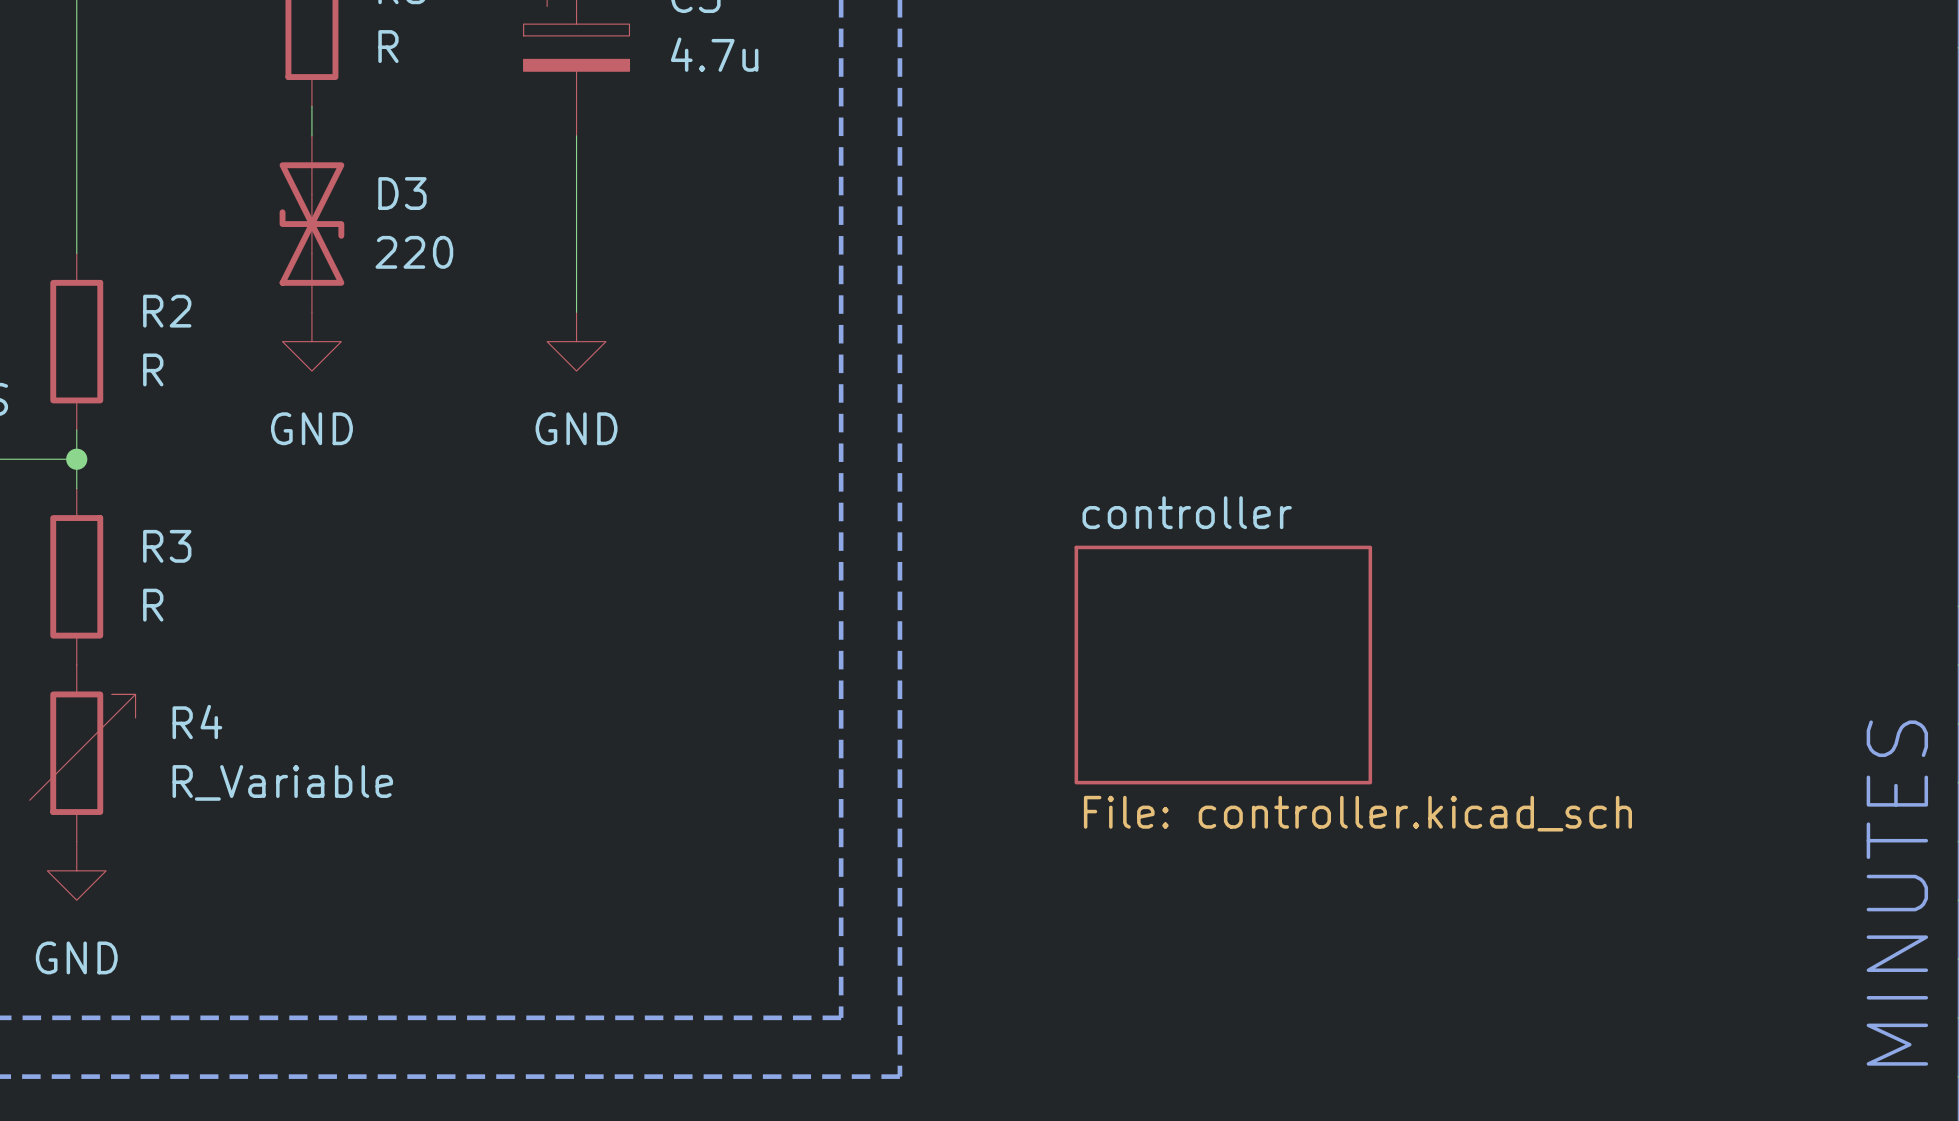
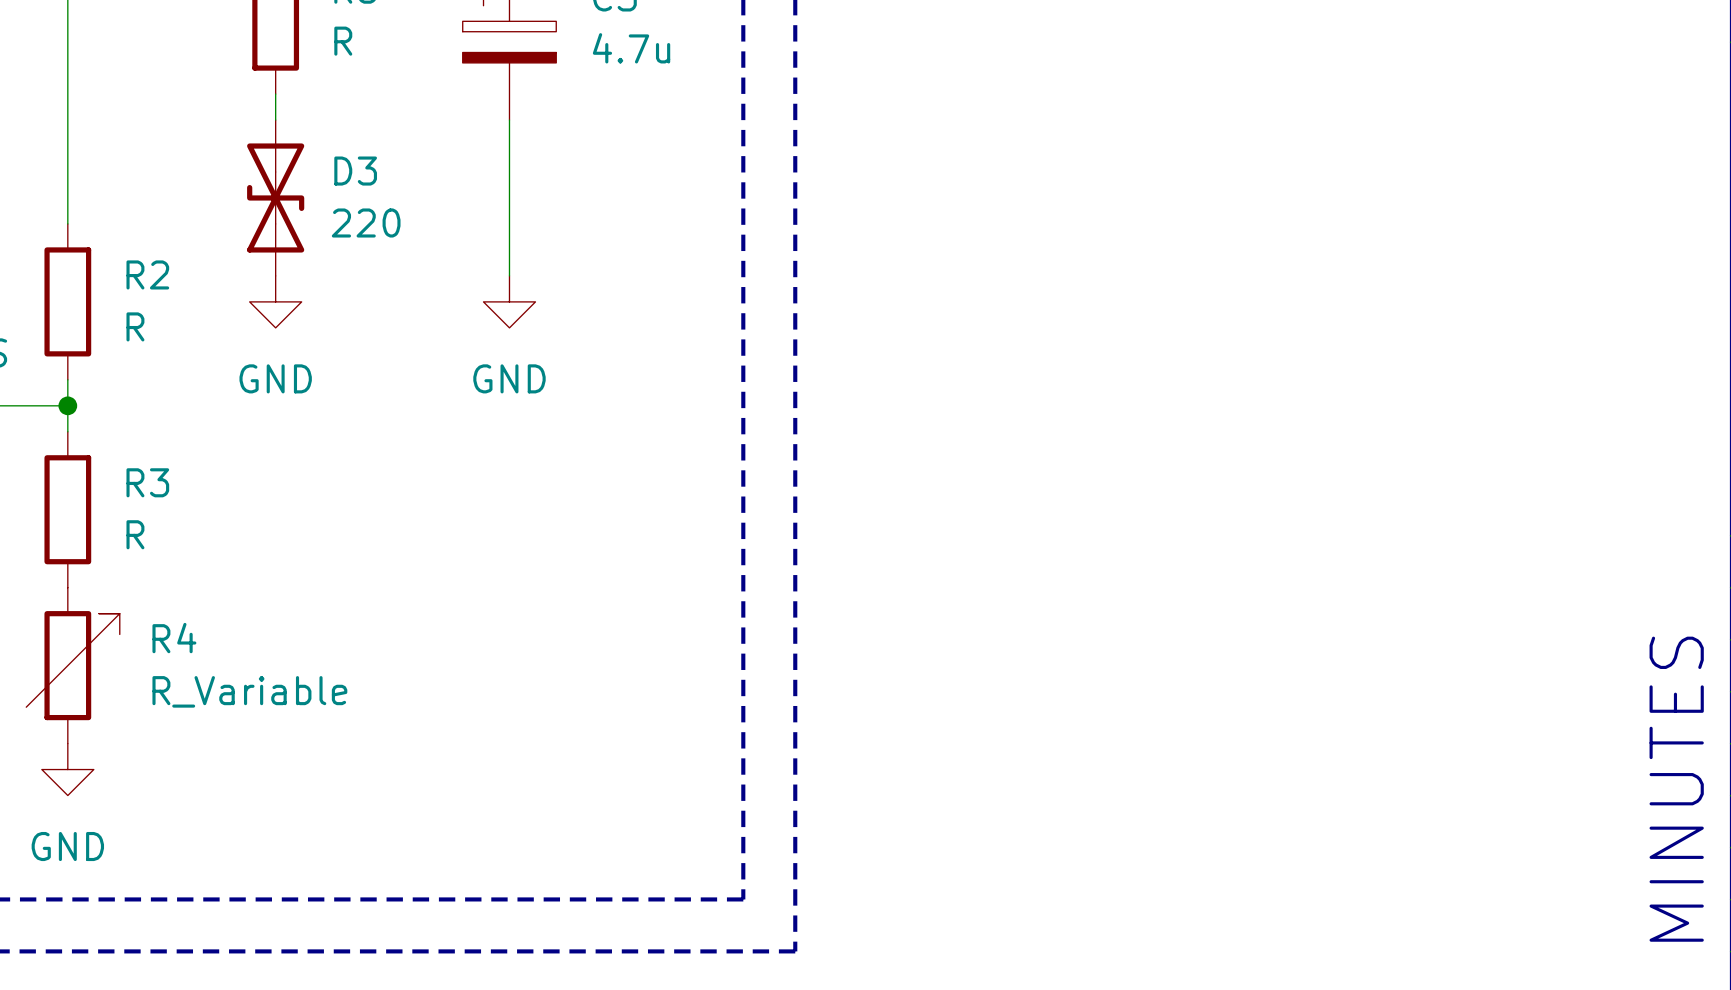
sheet controller: File: controller.kicad_sch (1223, 665) -> none

